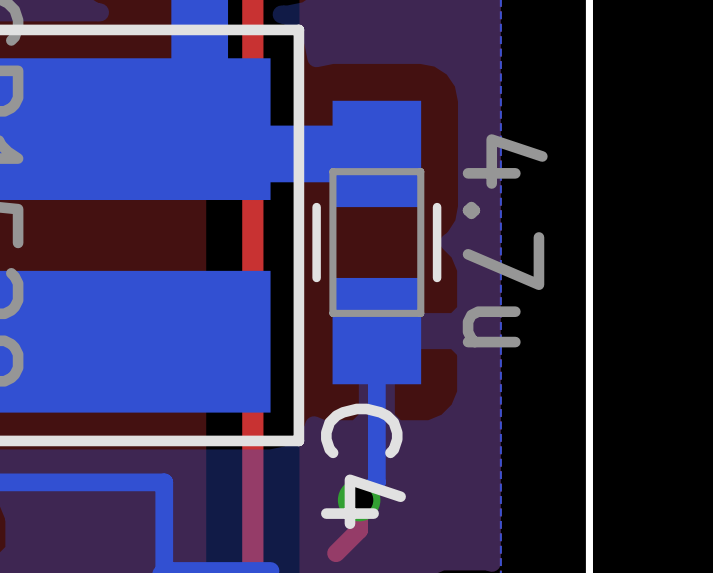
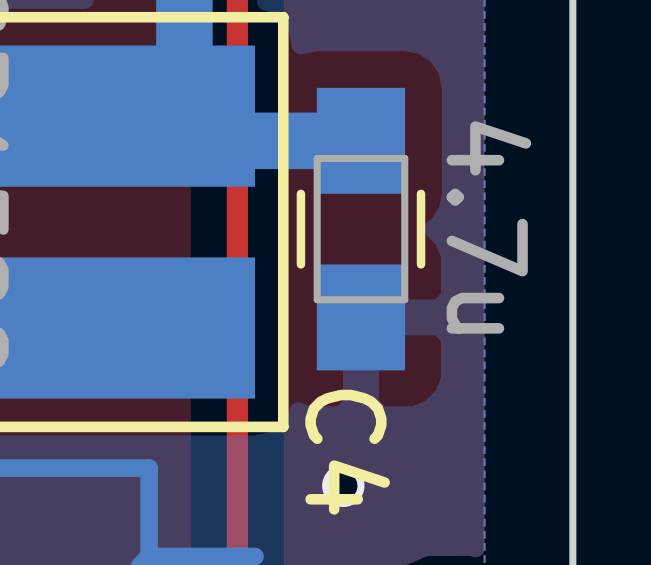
bottom track: (376, 331) (376, 482) (359, 500) -> none
top track: (359, 500) (359, 530) (336, 553) -> none

